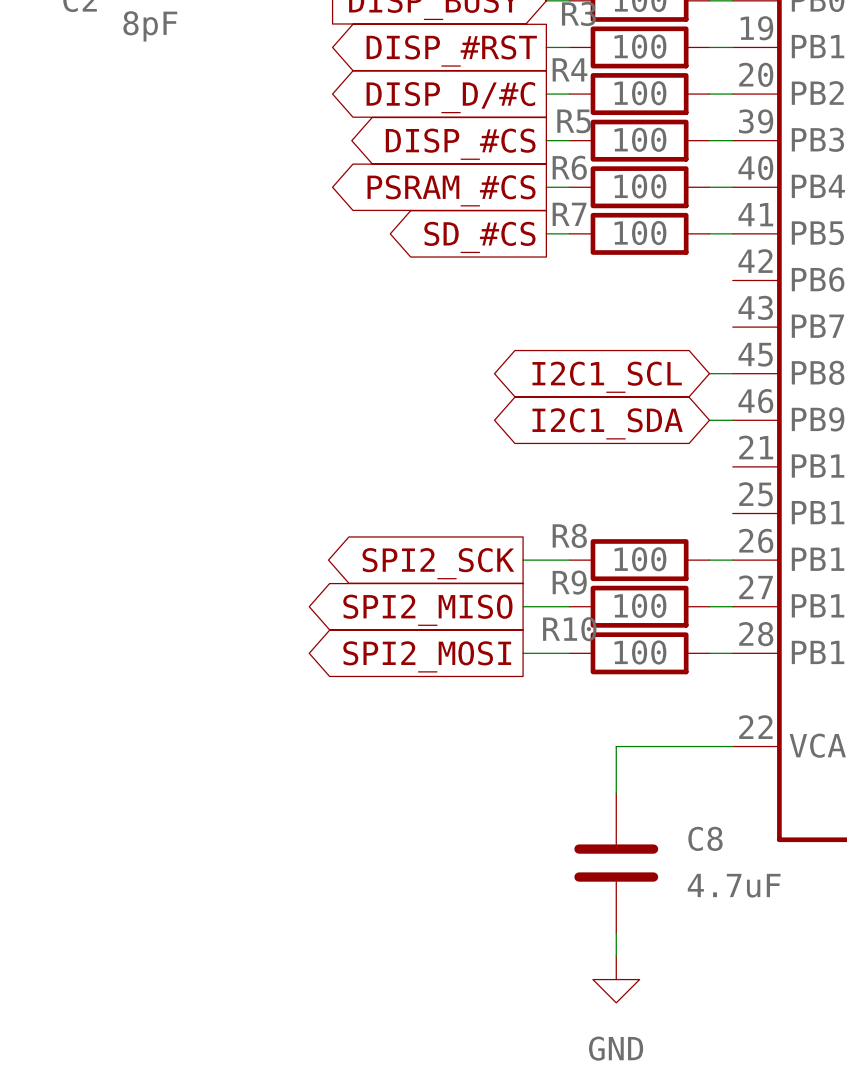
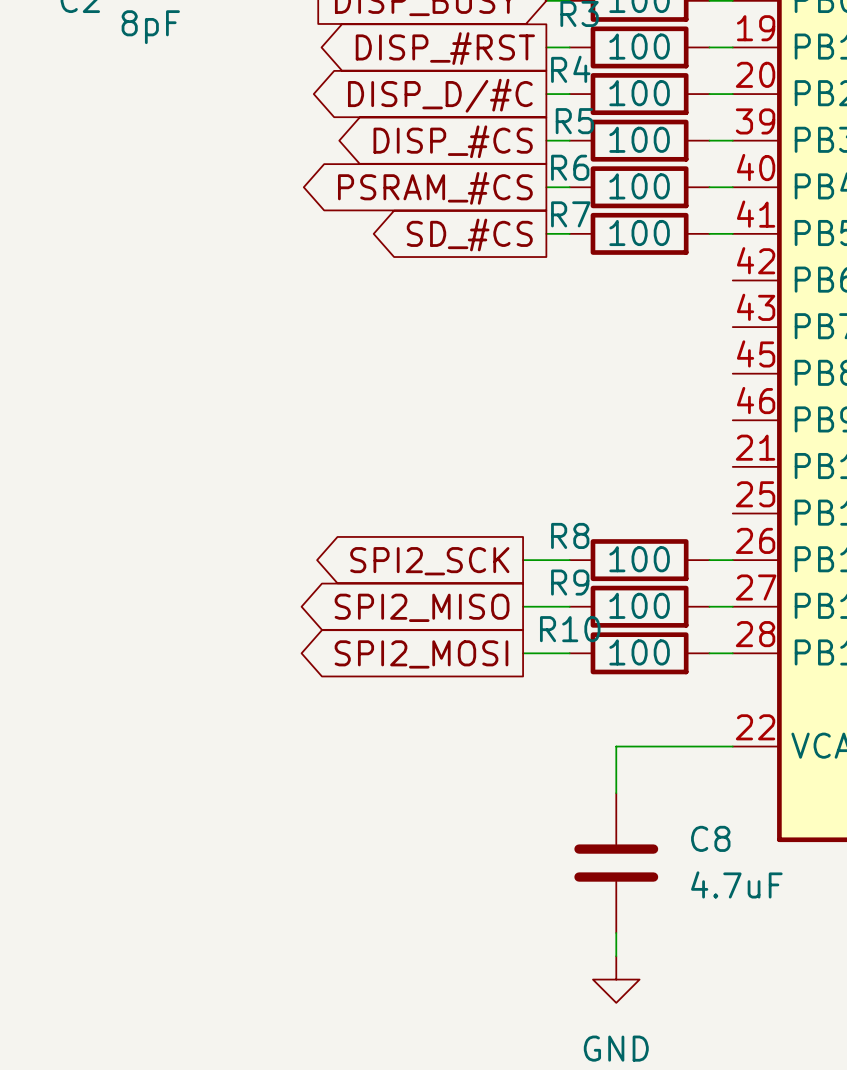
wire: (709, 373) (732, 373) -> none
global label: I2C1_SCL (607, 377) -> none
wire: (709, 420) (732, 420) -> none
global label: I2C1_SDA (607, 423) -> none

